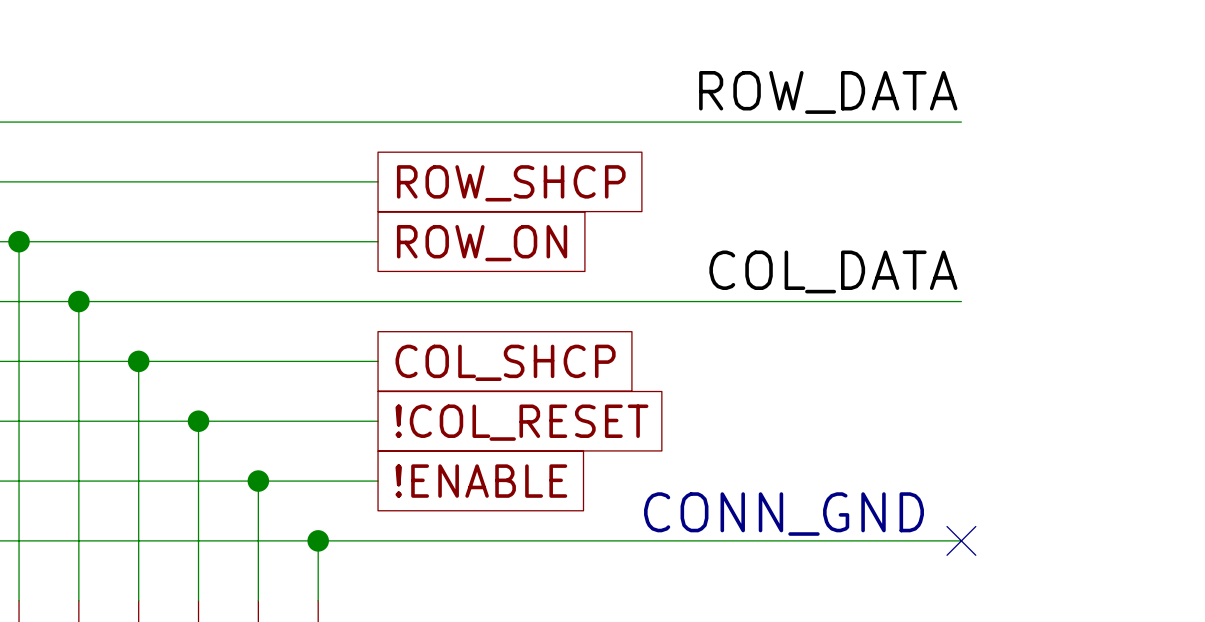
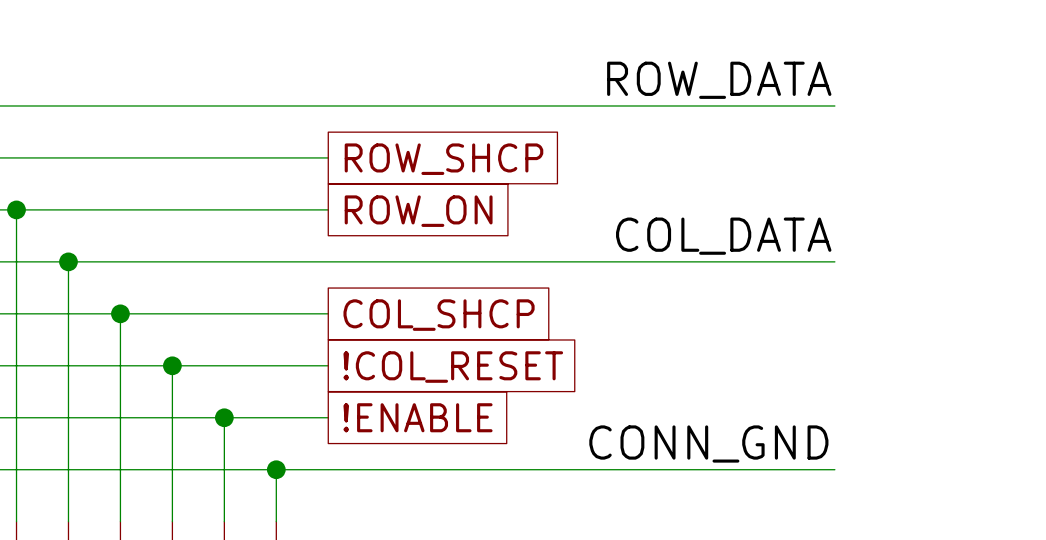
label: none -> CONN_GND (708, 444)
text: CONN_GND (784, 514) -> none
no-connect mark: (961, 540) -> none

